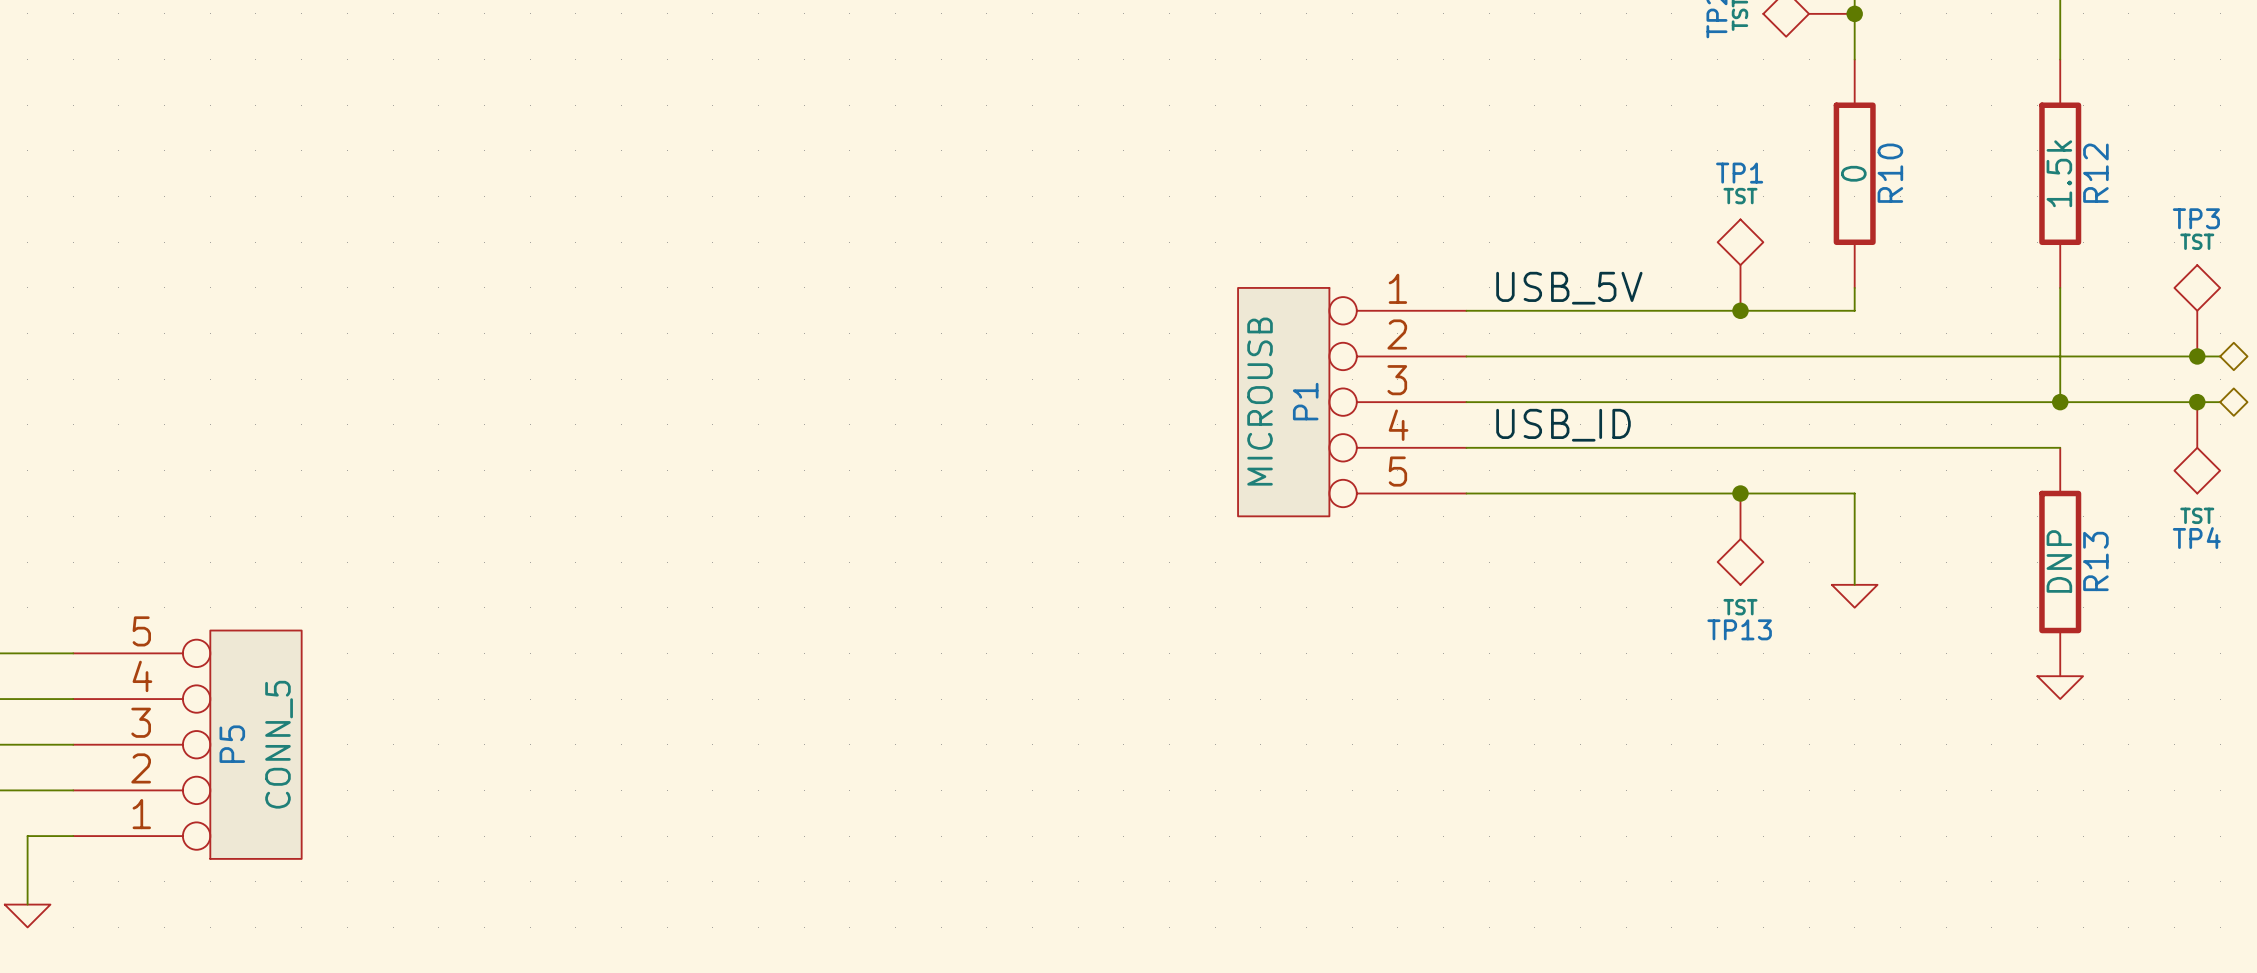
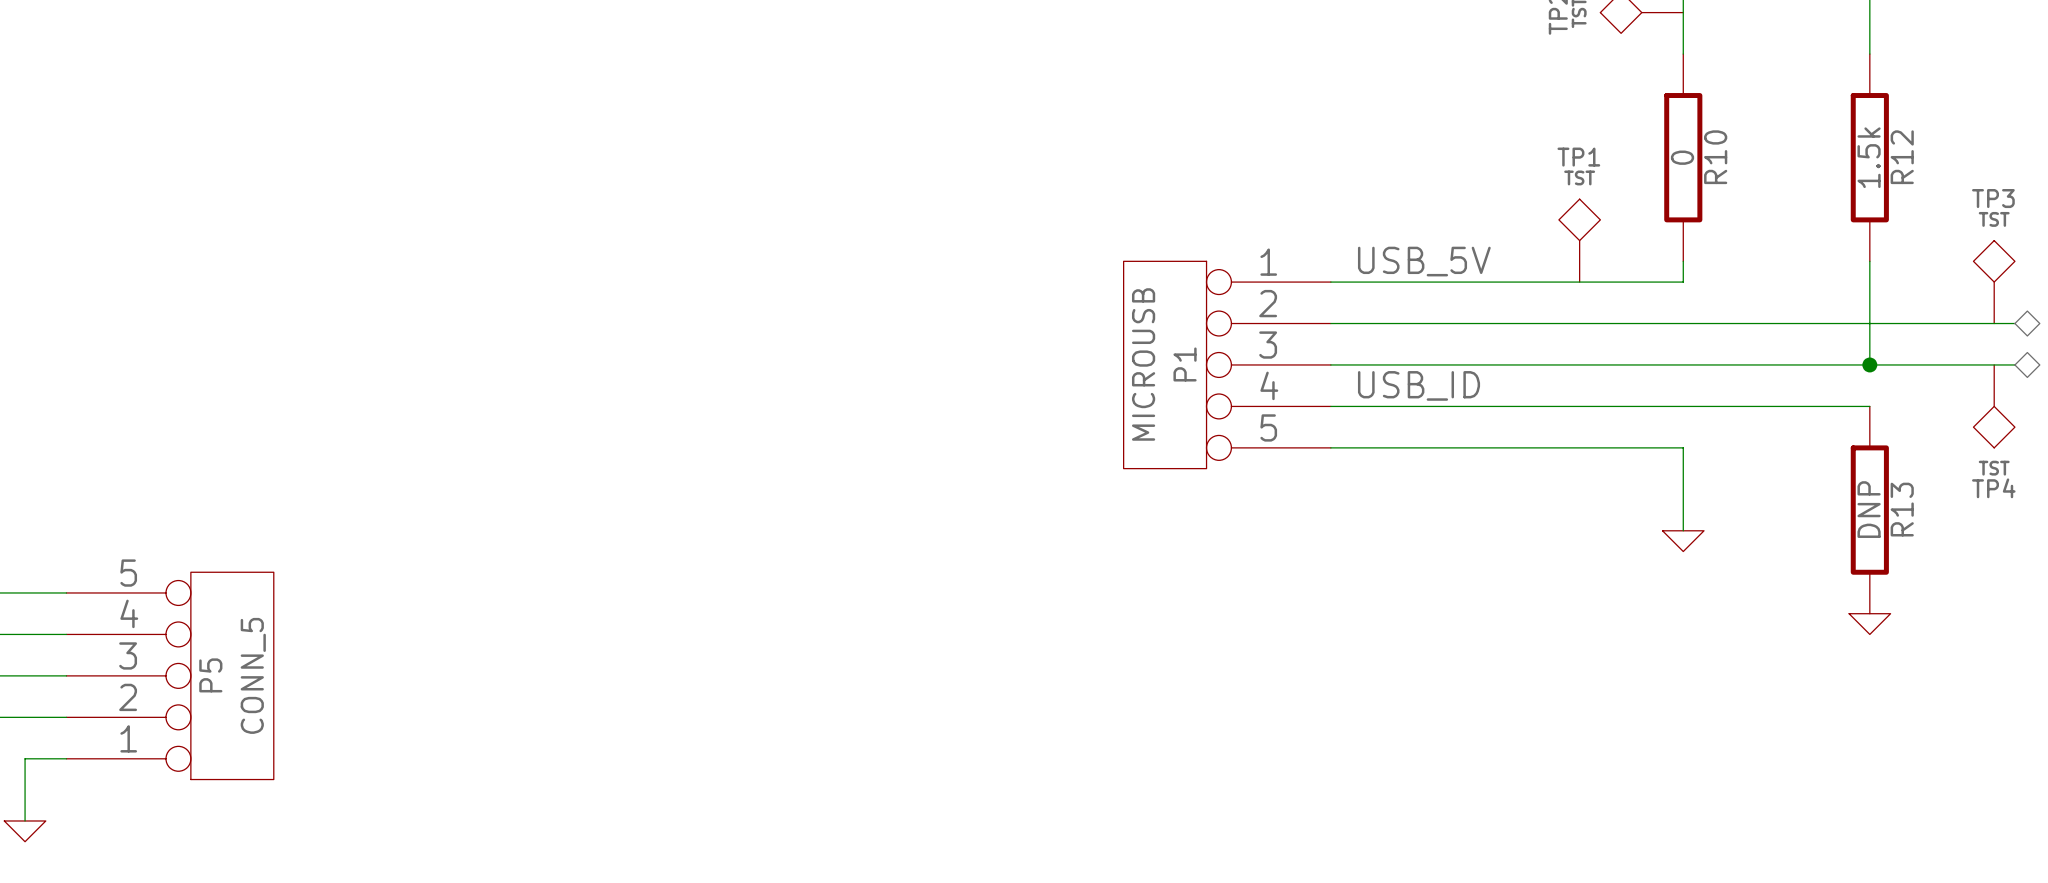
junction: (1854, 13) -> none
junction: (1740, 310) -> none
junction: (2197, 356) -> none
junction: (2197, 402) -> none
junction: (1740, 493) -> none
TP13: TST (1740, 539) -> none

